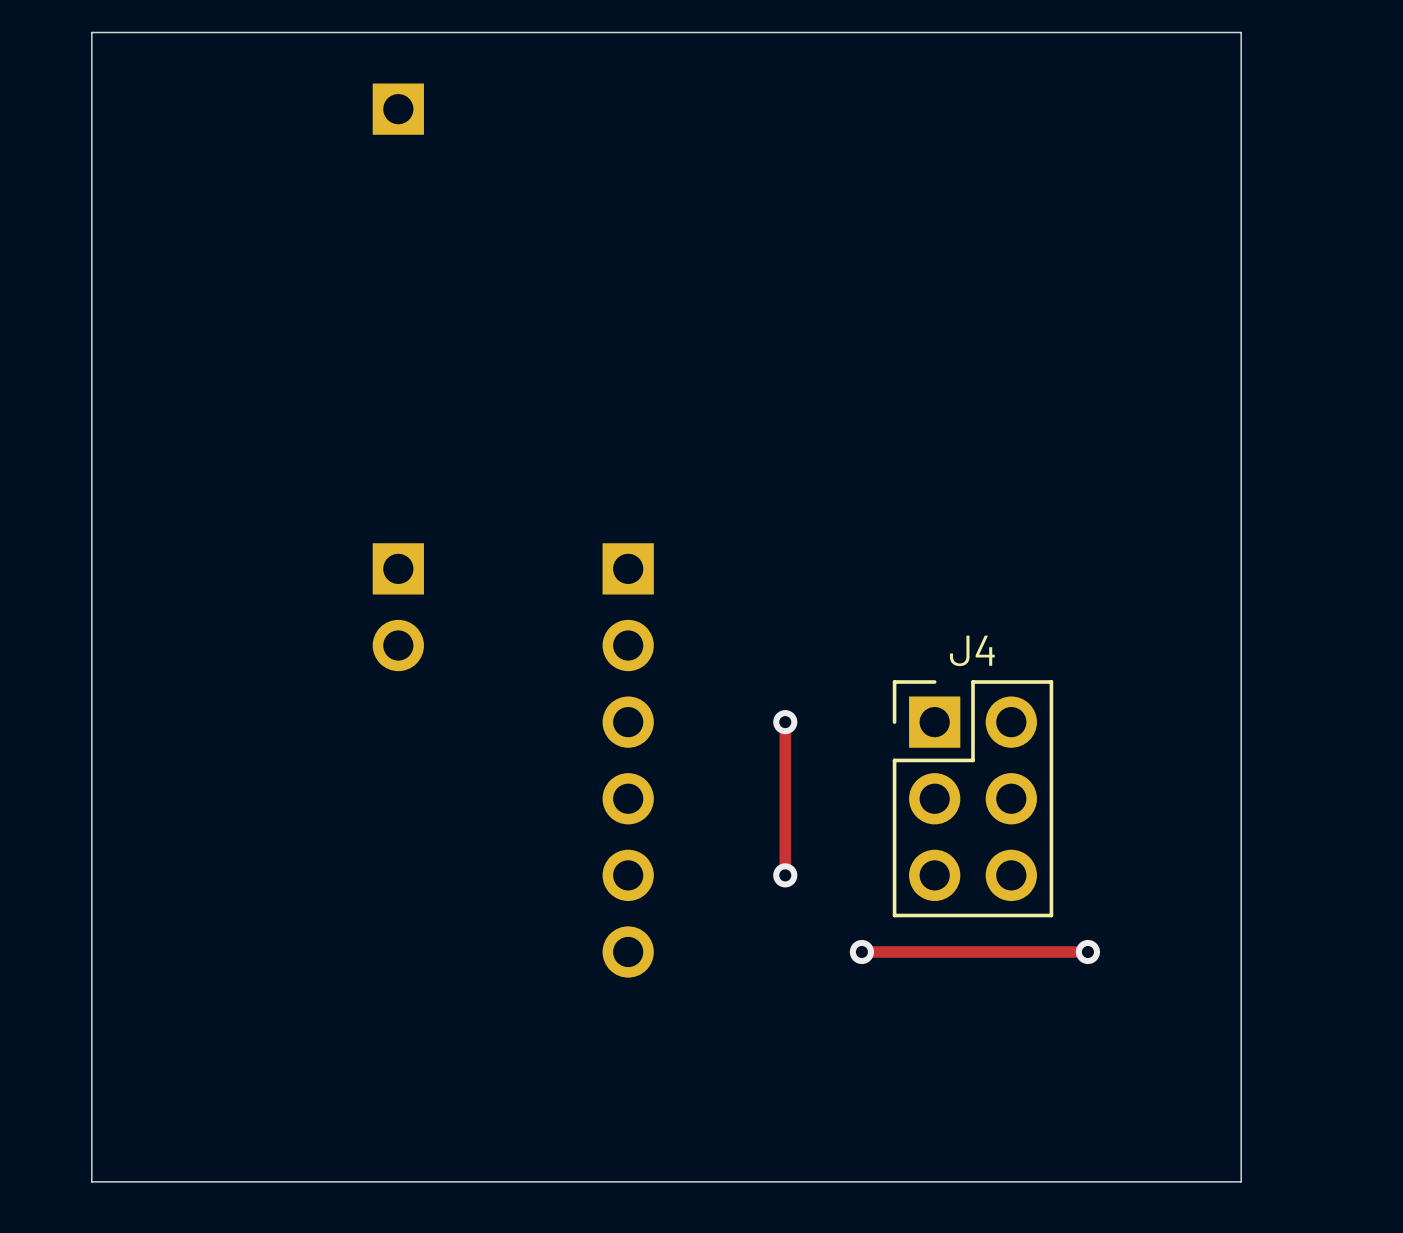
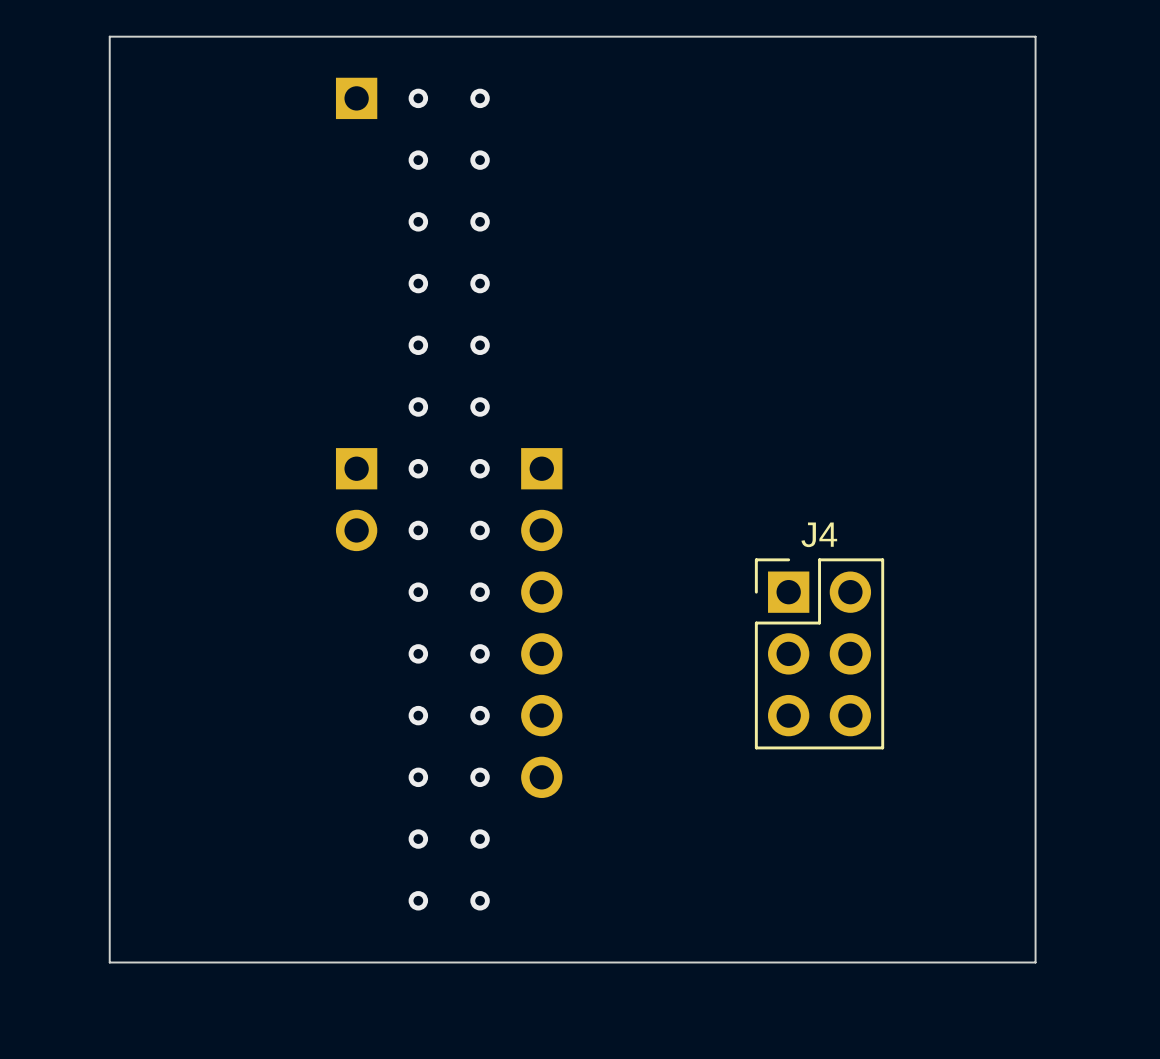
via: none -> (418, 98)
via: none -> (480, 98)
via: none -> (418, 160)
via: none -> (480, 160)
via: none -> (418, 221)
via: none -> (480, 221)
via: none -> (418, 283)
via: none -> (480, 283)
via: none -> (418, 345)
via: none -> (480, 345)
via: none -> (418, 407)
via: none -> (480, 407)
via: none -> (418, 468)
via: none -> (480, 468)
via: none -> (418, 530)
via: none -> (480, 530)
via: none -> (418, 592)
via: none -> (480, 592)
track: (785, 722) (785, 875) -> none
via: (785, 722) -> none
via: none -> (418, 653)
via: none -> (480, 653)
via: none -> (418, 715)
via: none -> (480, 715)
via: (785, 875) -> none
via: none -> (418, 777)
via: none -> (480, 777)
track: (861, 951) (1087, 951) -> none
via: (861, 951) -> none
via: (1087, 951) -> none
via: none -> (418, 839)
via: none -> (480, 839)
via: none -> (418, 900)
via: none -> (480, 900)

